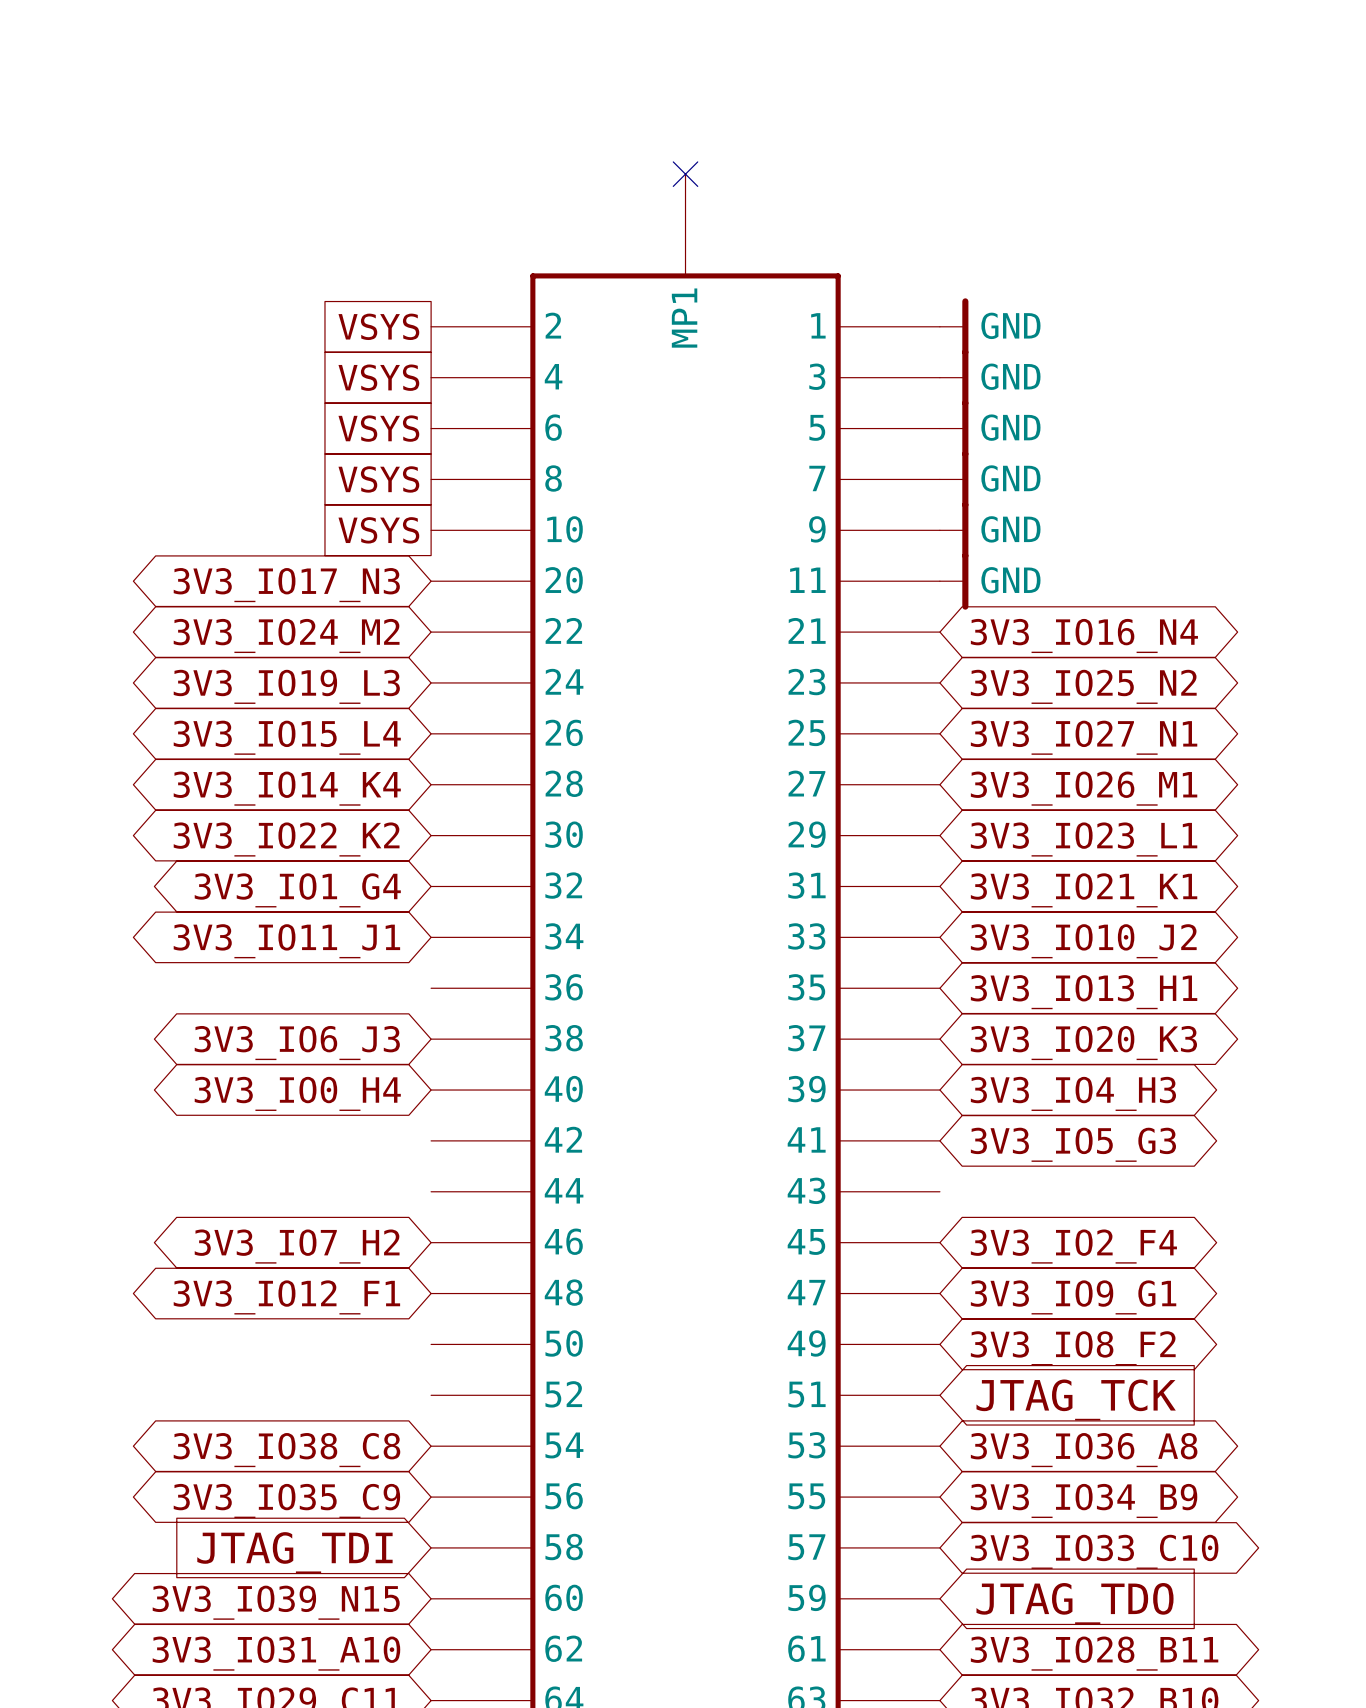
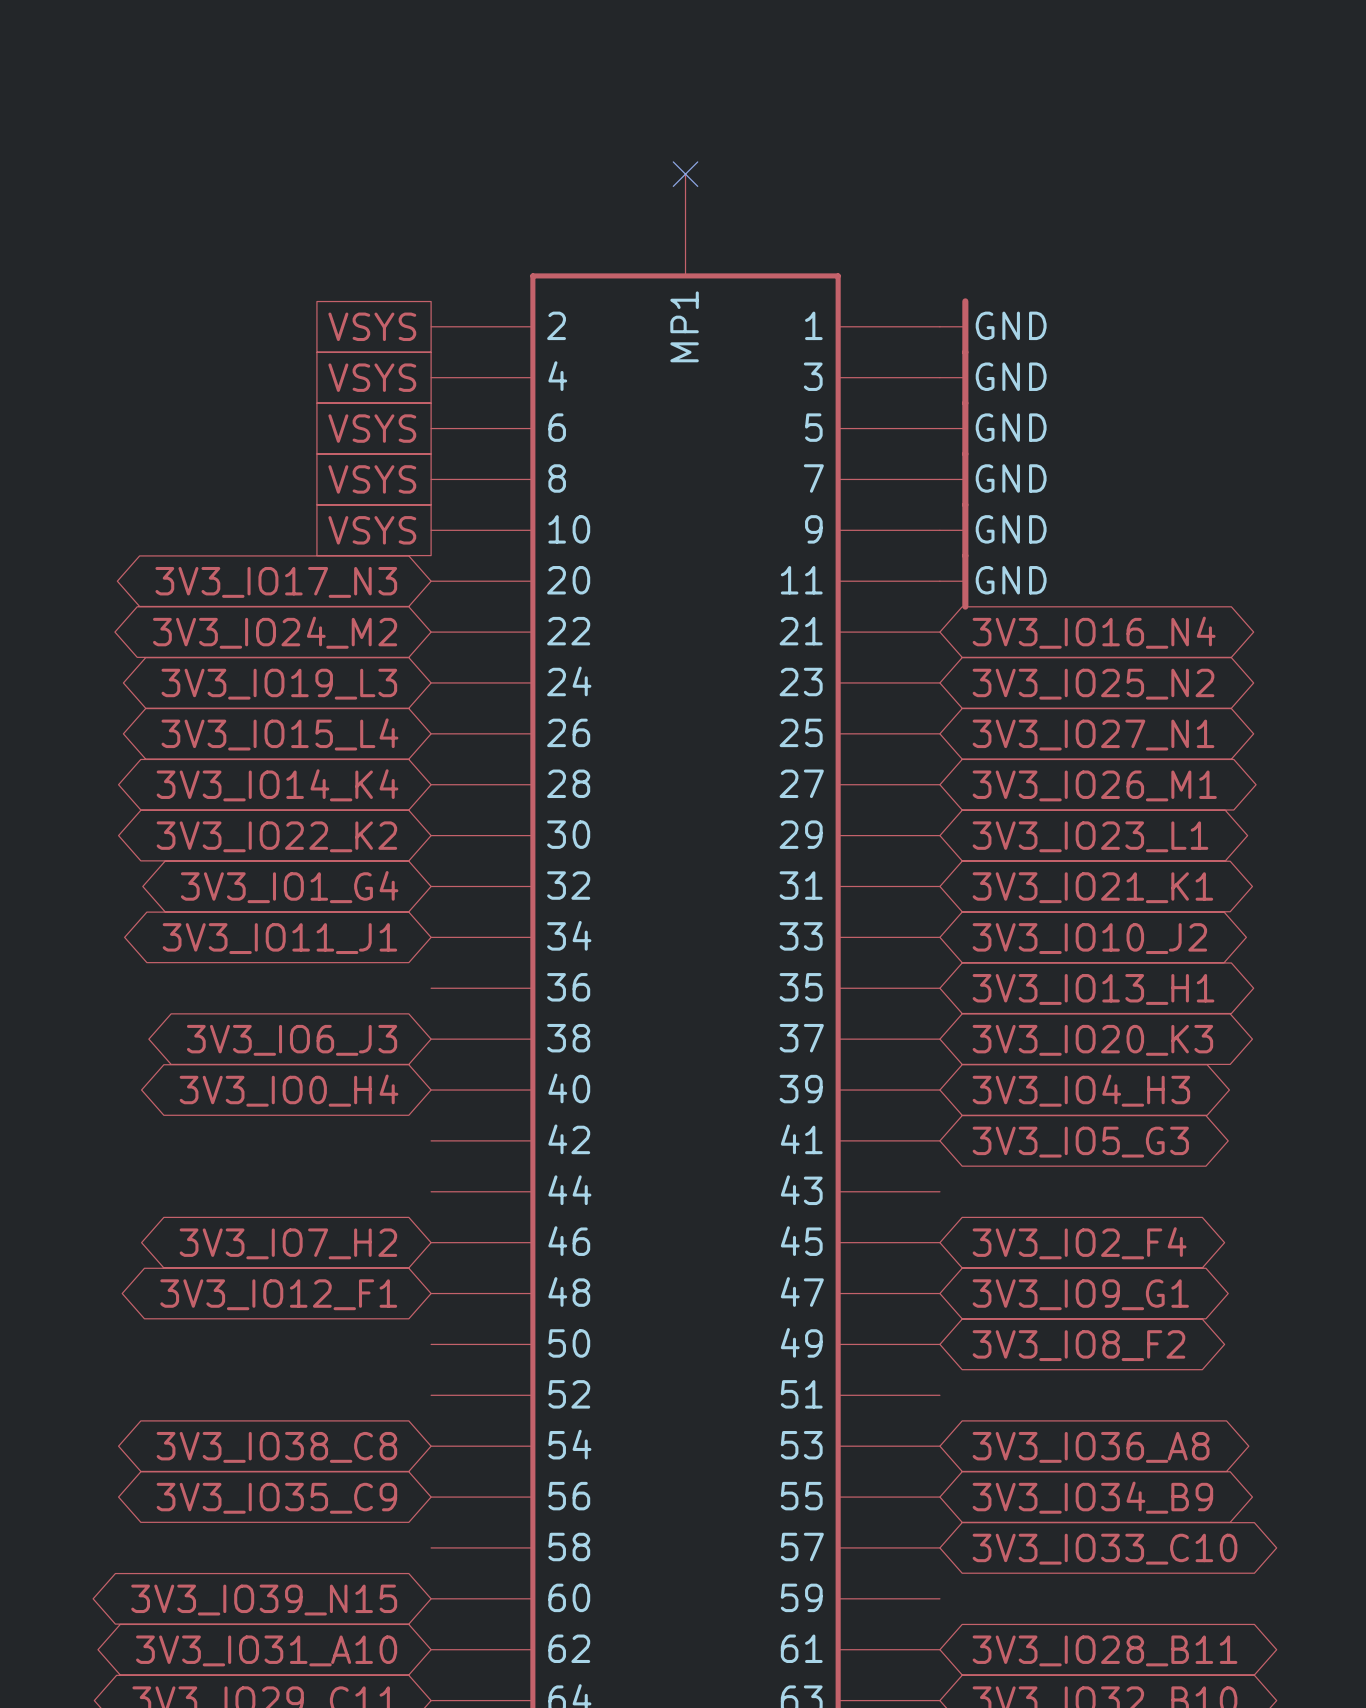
global label: JTAG_TCK (1076, 1399) -> none
global label: JTAG_TDI (294, 1552) -> none
global label: JTAG_TDO (1075, 1603) -> none

